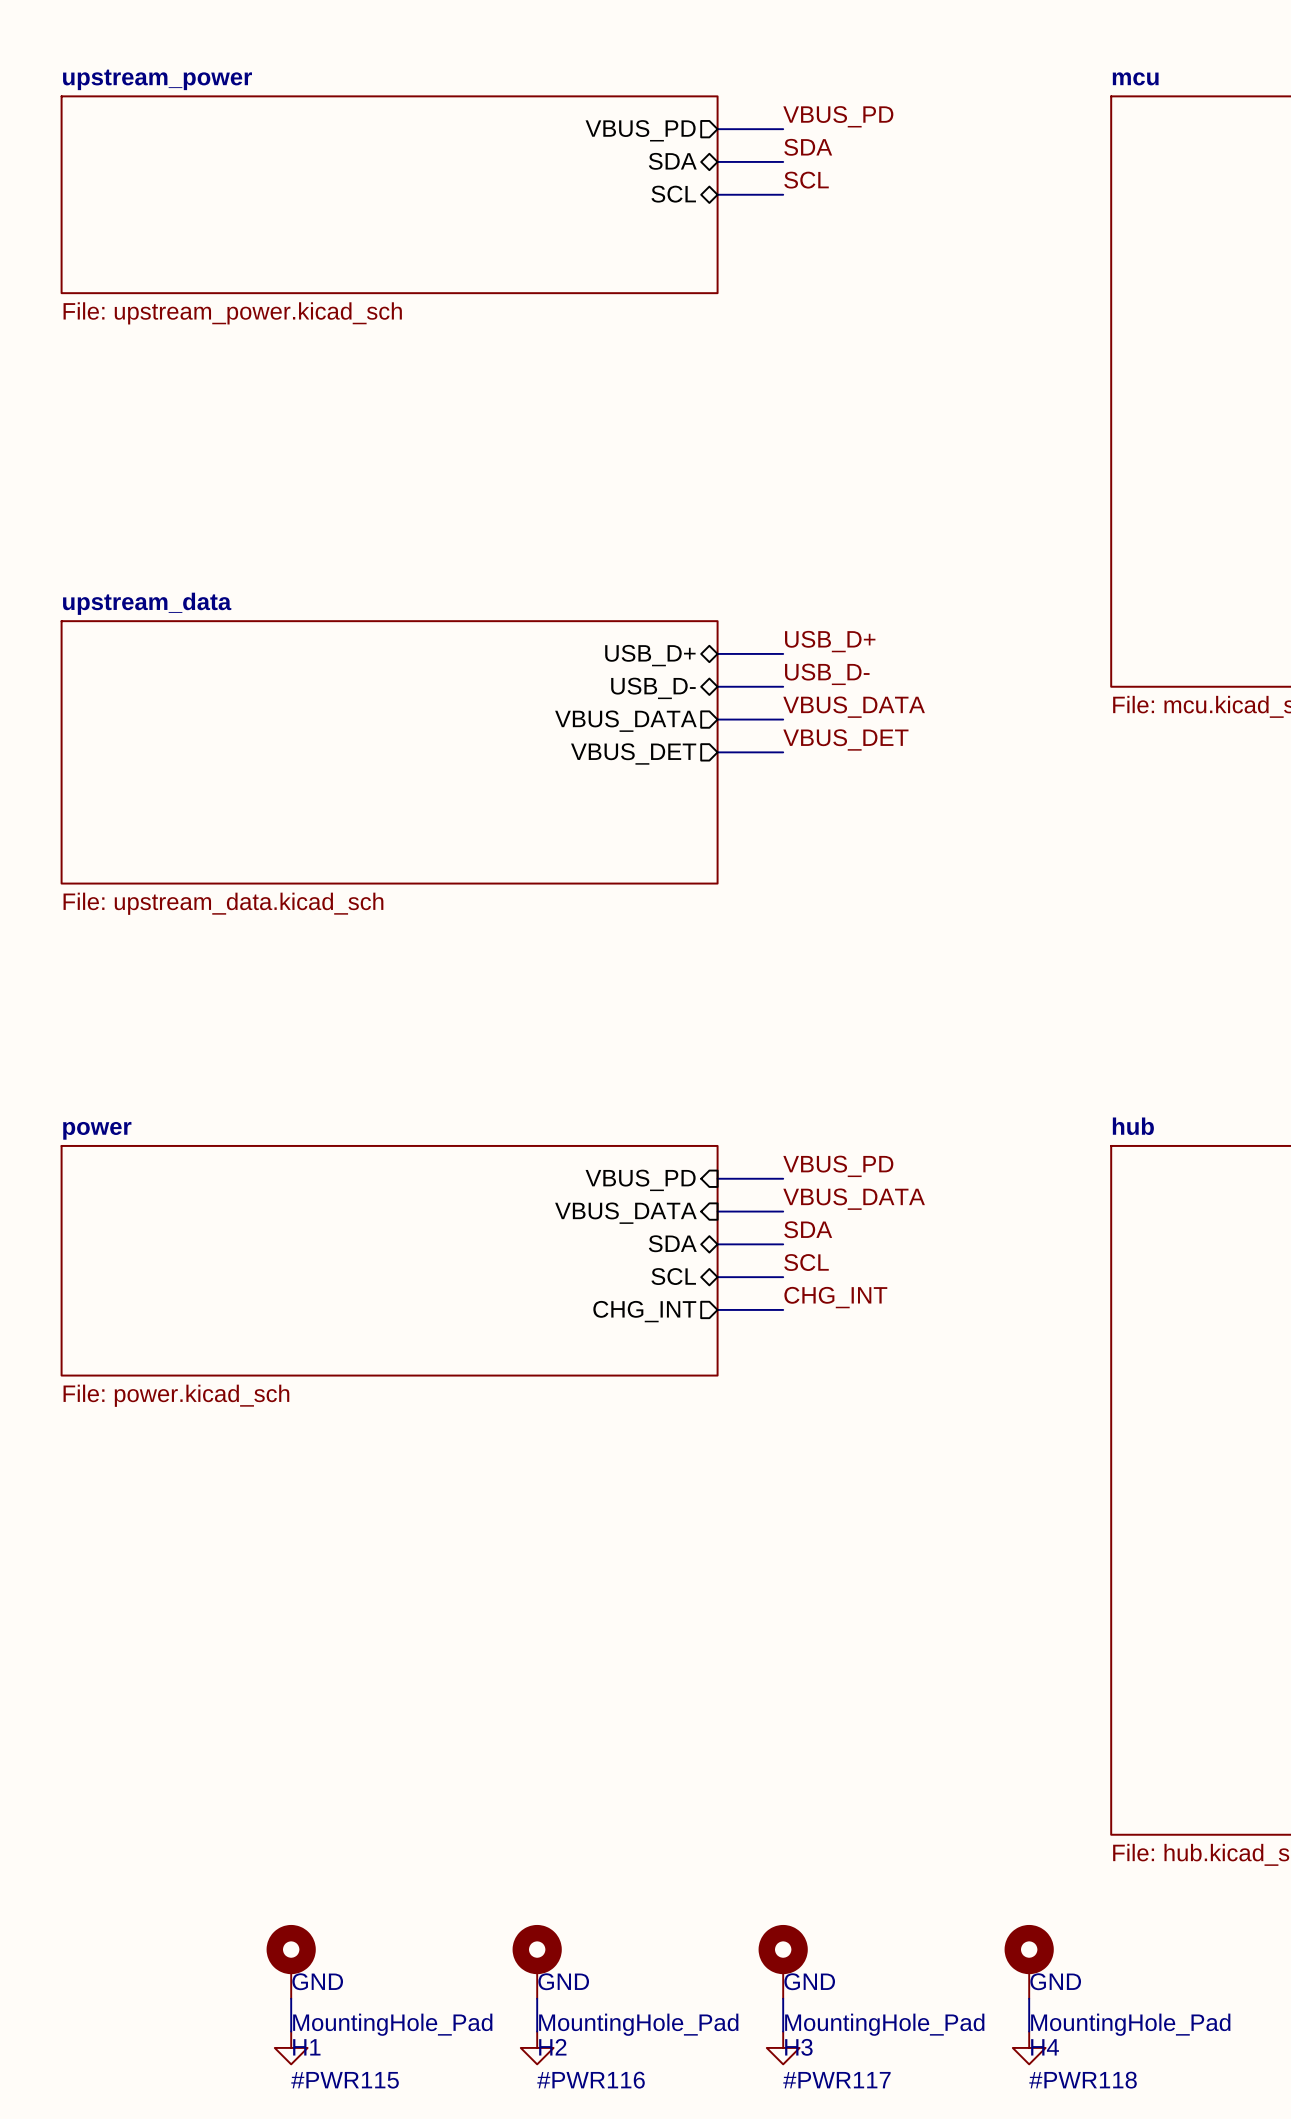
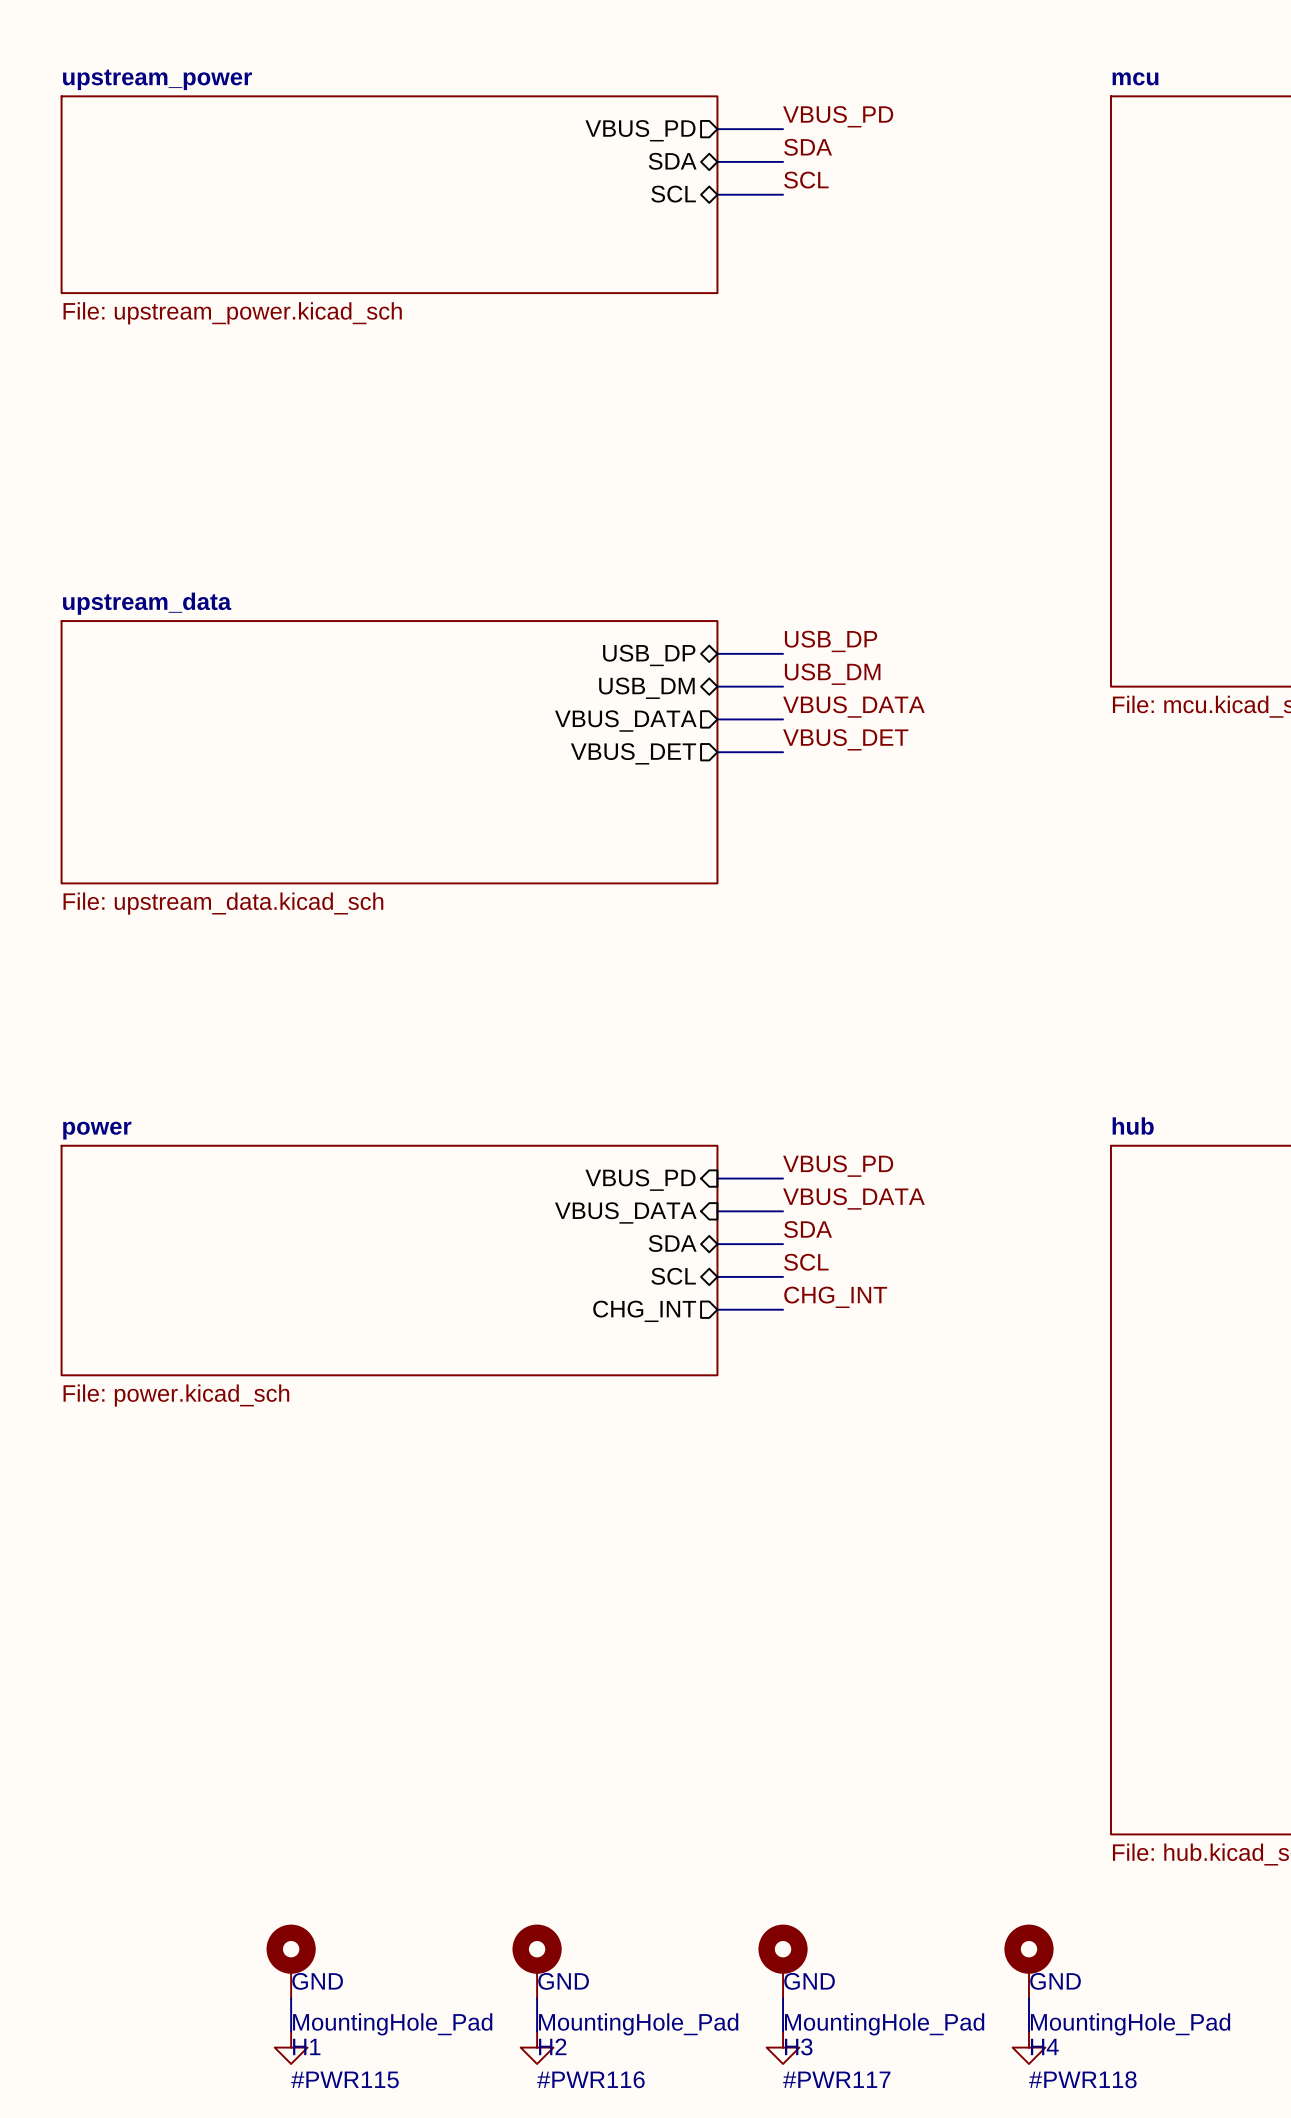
label: USB_D+ (830, 641) -> USB_DP (831, 641)
sheet pin: USB_D+ (650, 655) -> USB_DP (649, 655)
label: USB_D- (827, 674) -> USB_DM (832, 674)
sheet pin: USB_D- (653, 688) -> USB_DM (646, 688)

